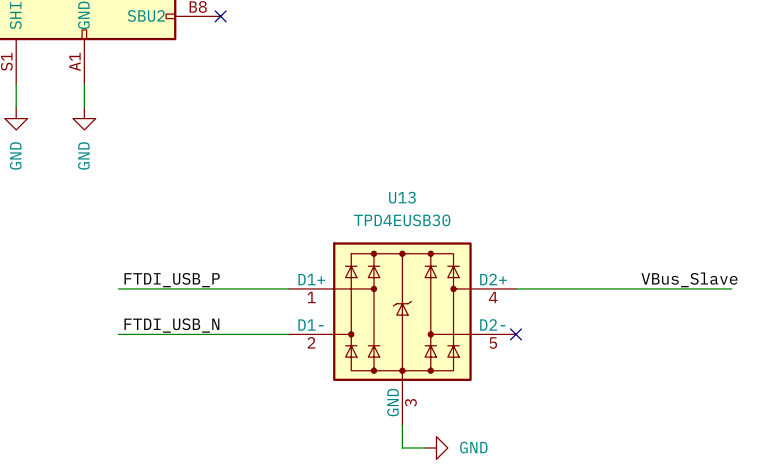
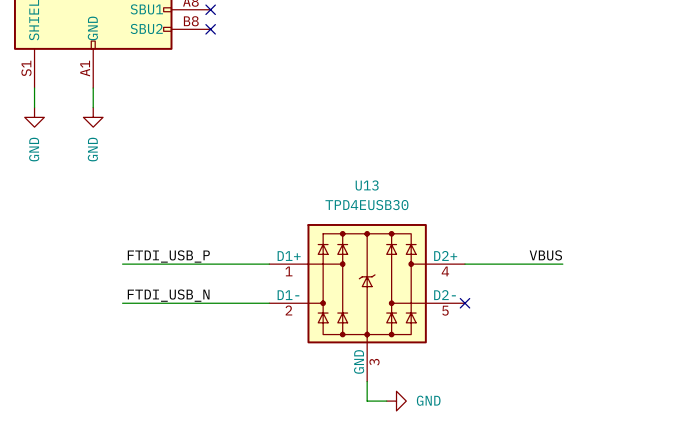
label: none -> VBUS (545, 255)
label: VBus_Slave (689, 279) -> none
wire: (629, 288) (731, 288) -> none

